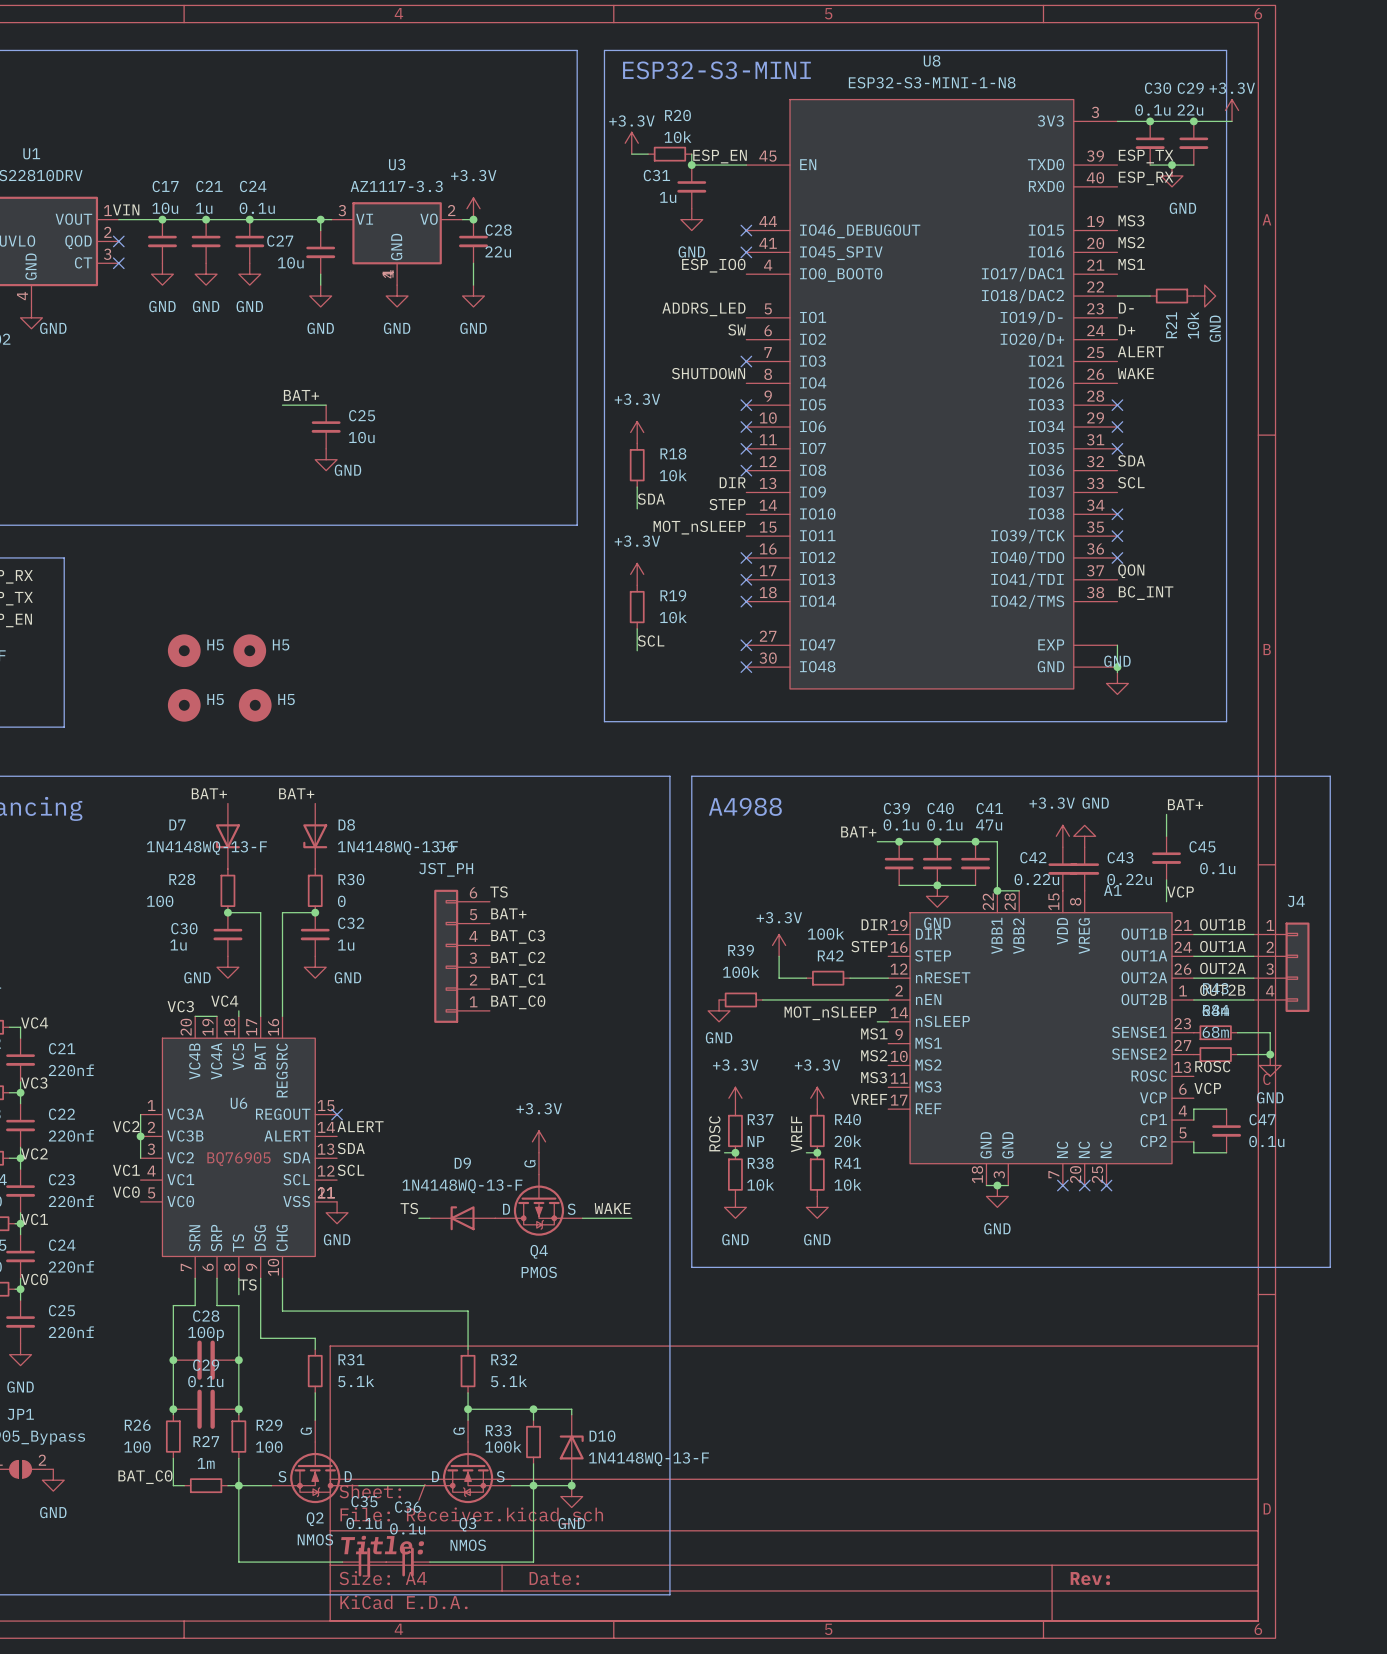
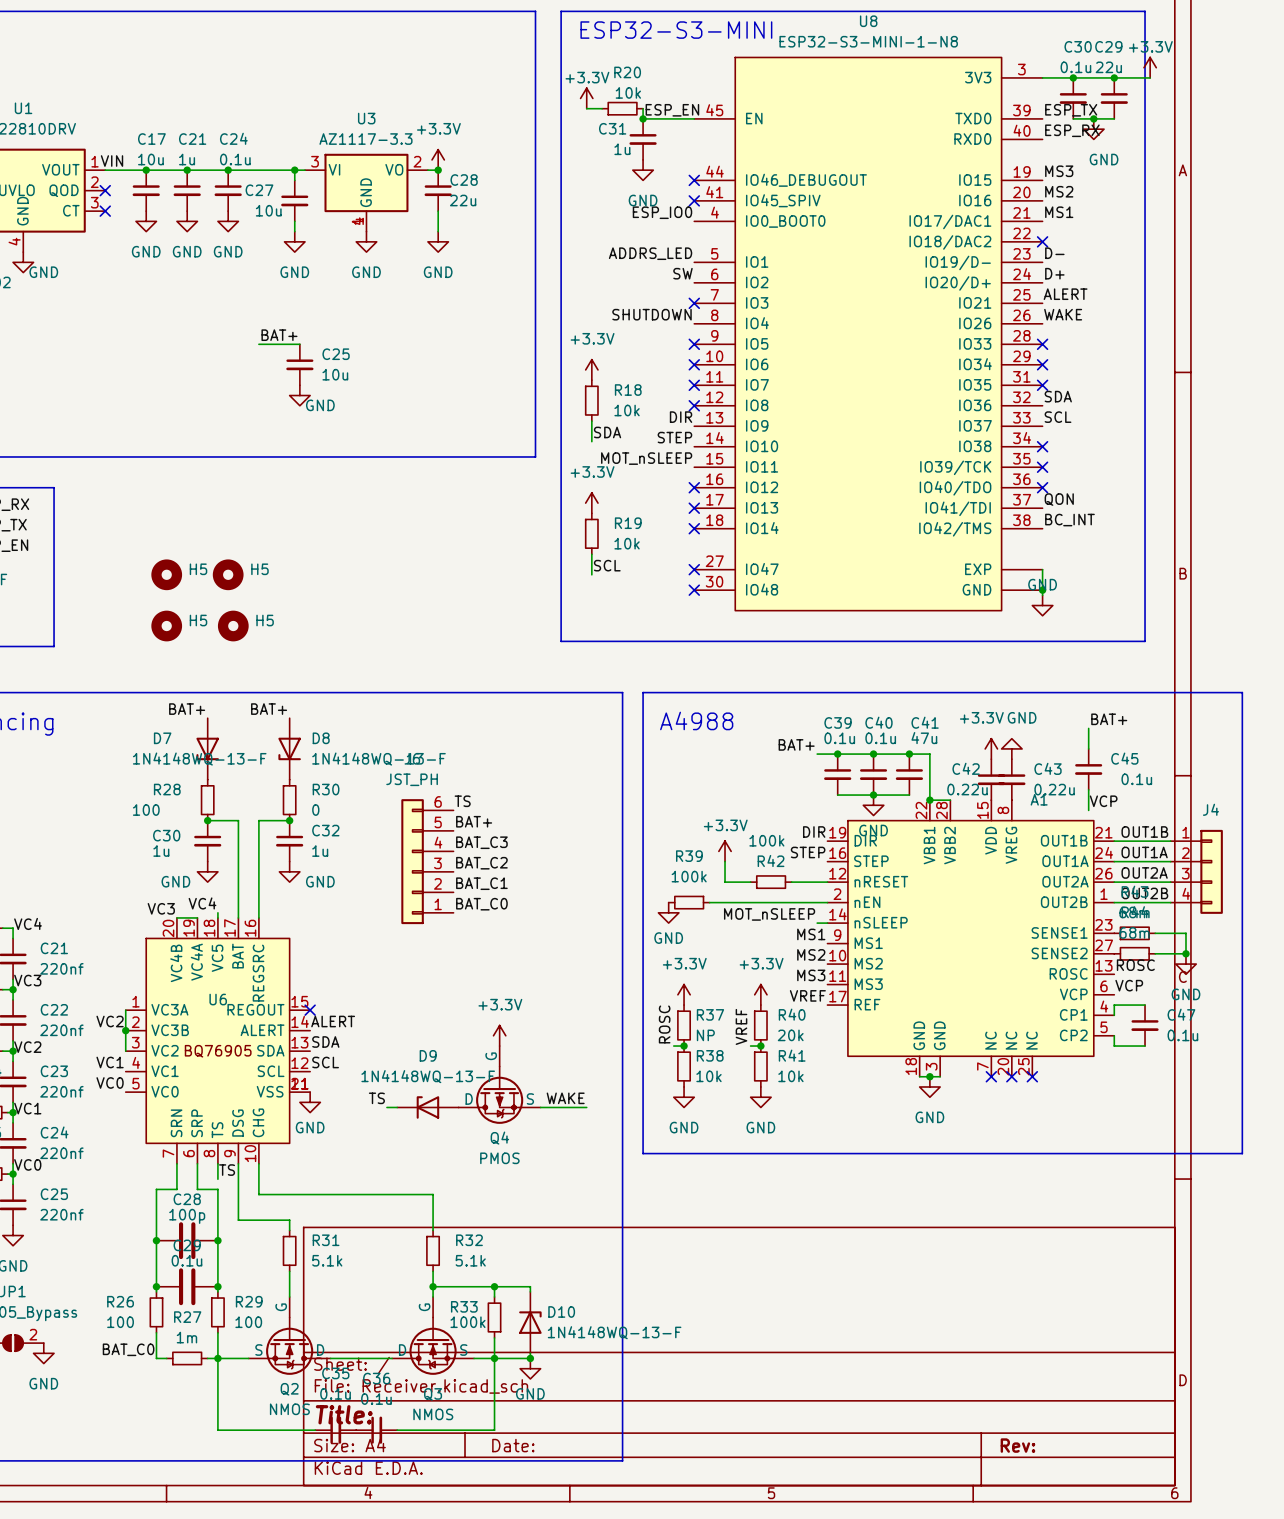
wire: (1117, 296) (1150, 296) -> none
no-connect mark: none -> (1042, 241)
R21: 10k (1172, 296) -> none
power symbol: GND (1204, 296) -> none

